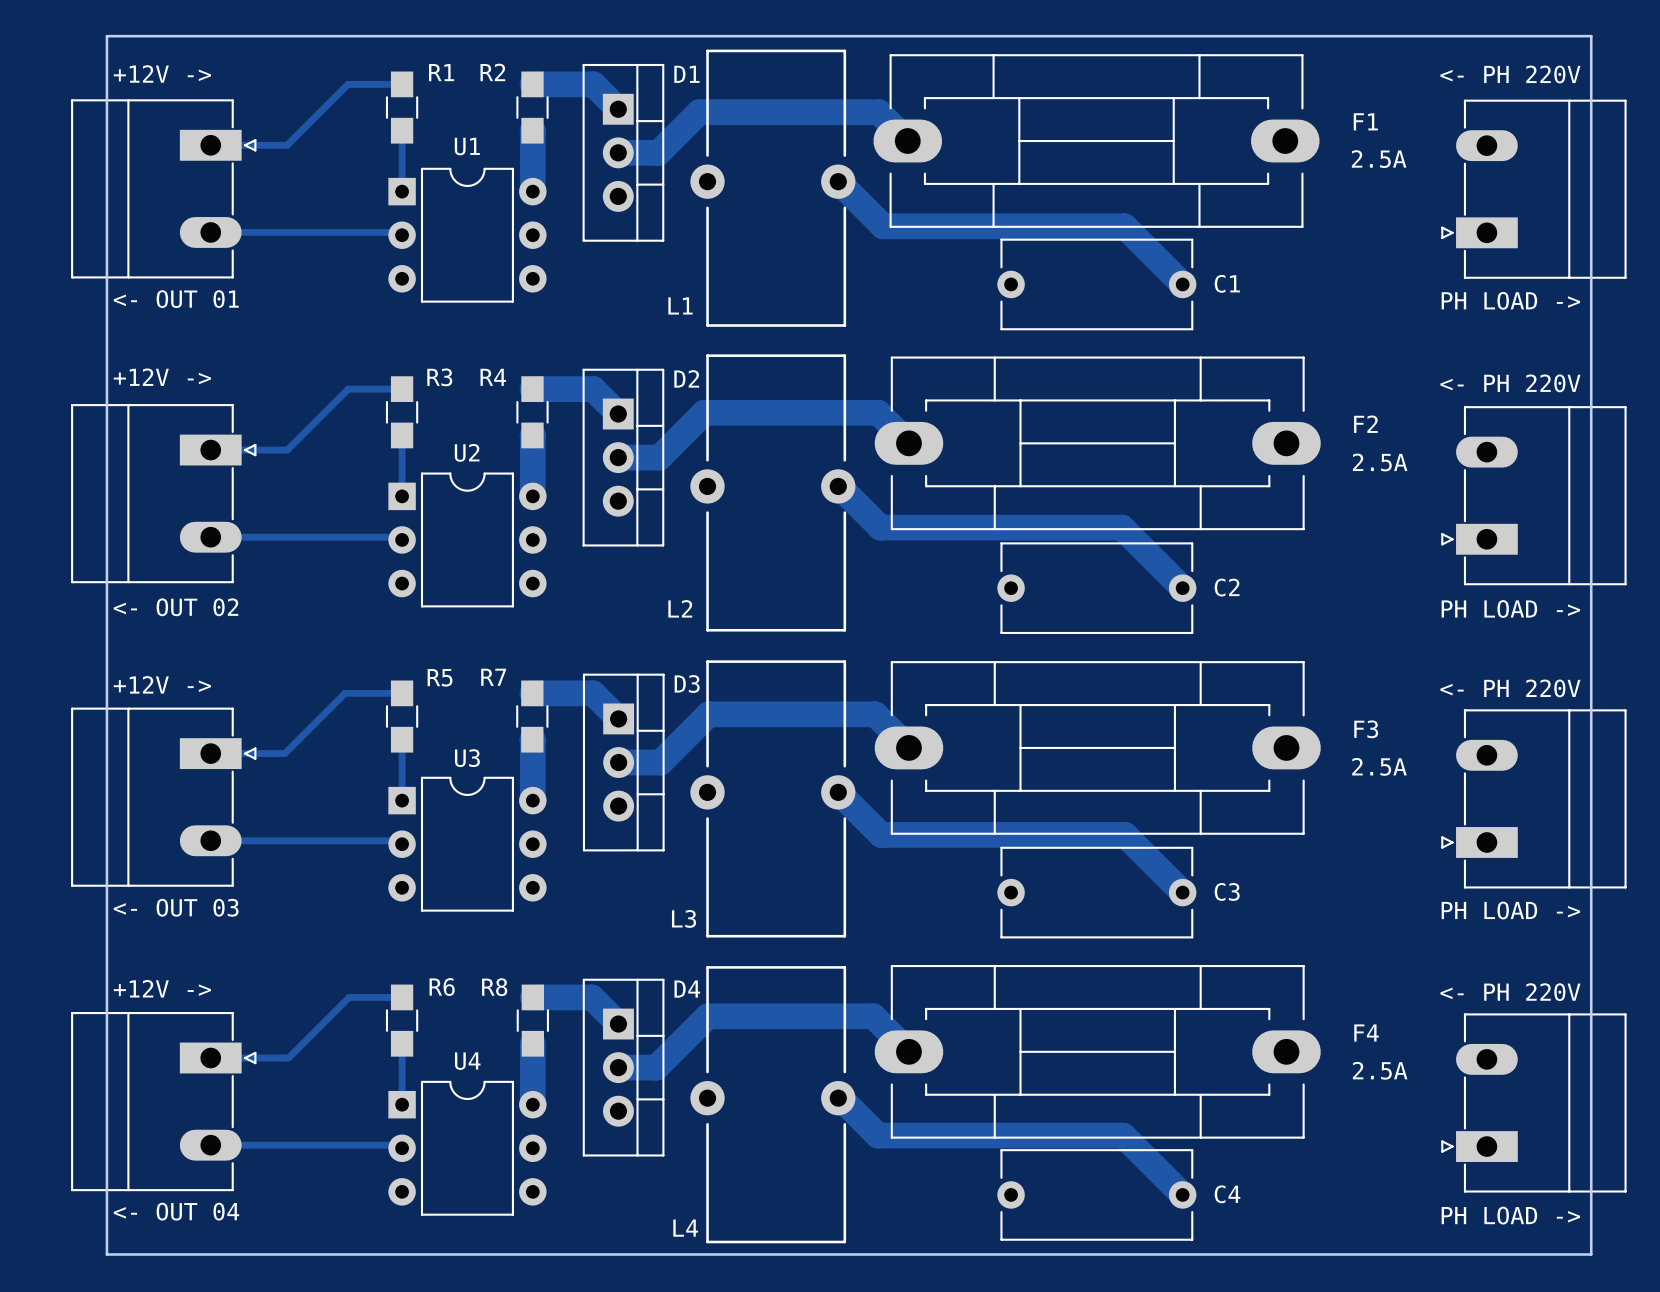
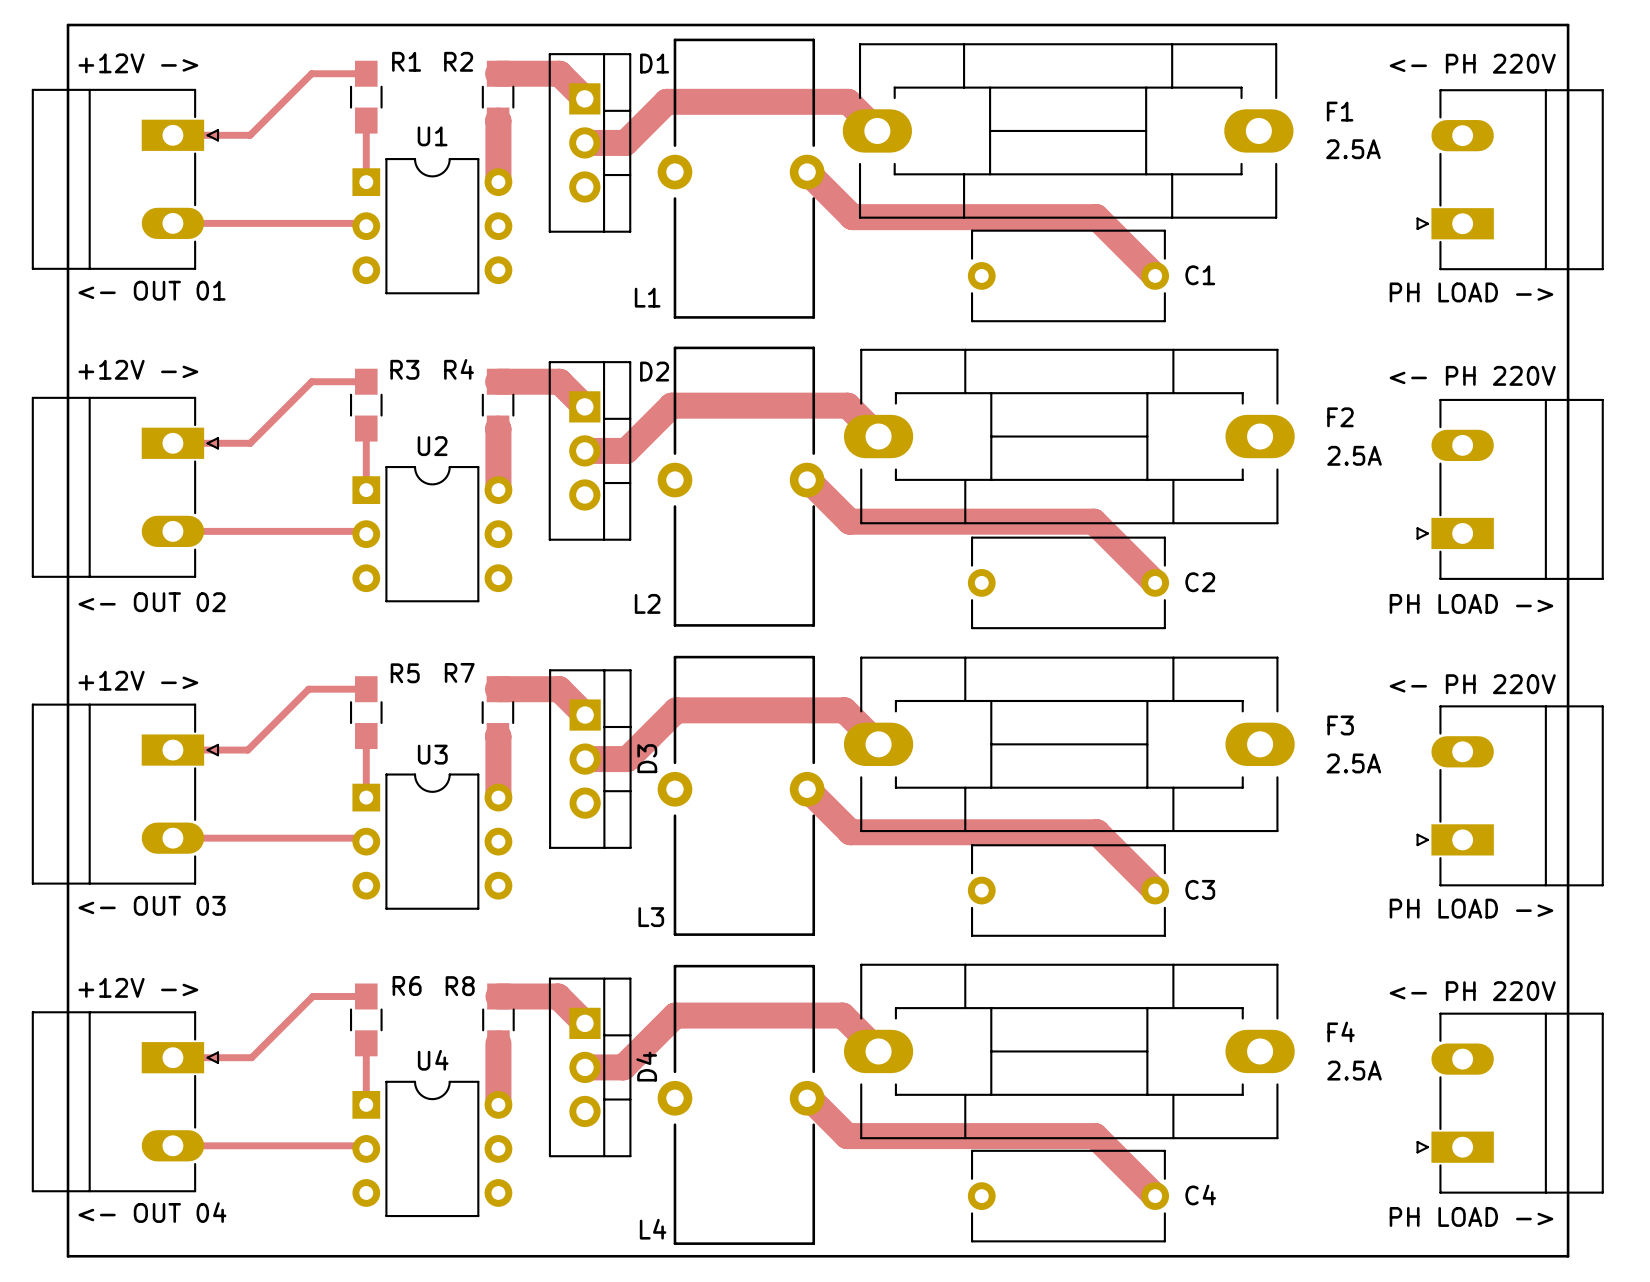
D3 name rotation: 0° (687, 683) -> 90° counterclockwise (647, 758)
D3 name position: D3 (687, 683) -> D3 (647, 758)
D4 name rotation: 0° (687, 989) -> 90° counterclockwise (646, 1066)
D4 name position: D4 (687, 989) -> D4 (646, 1066)

